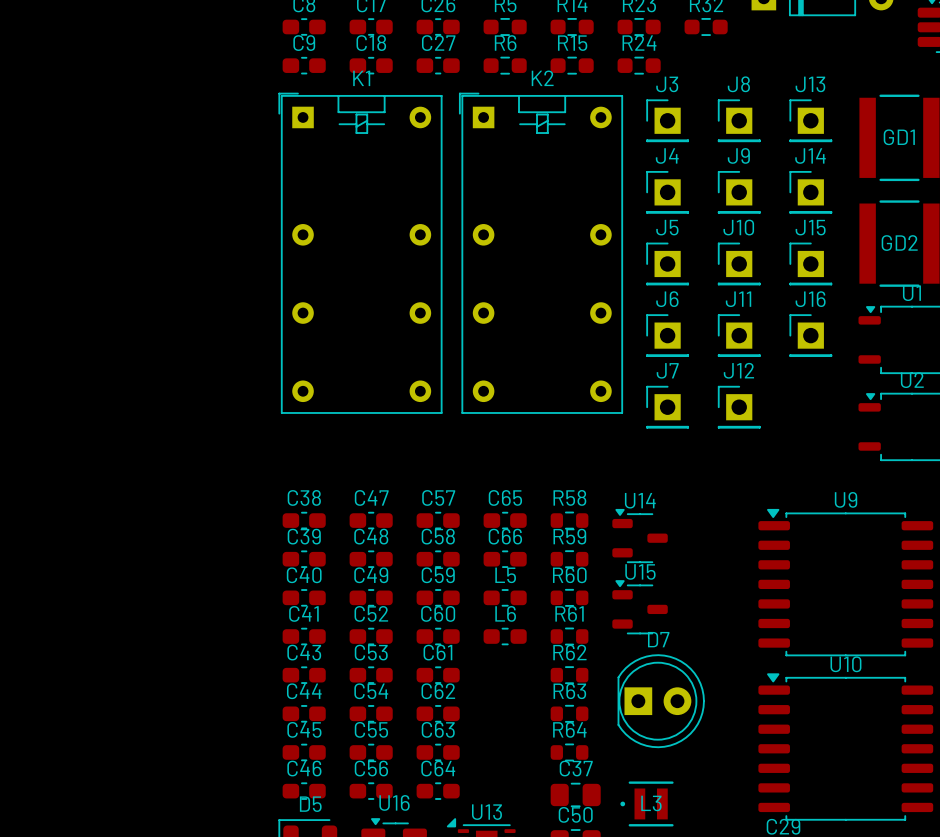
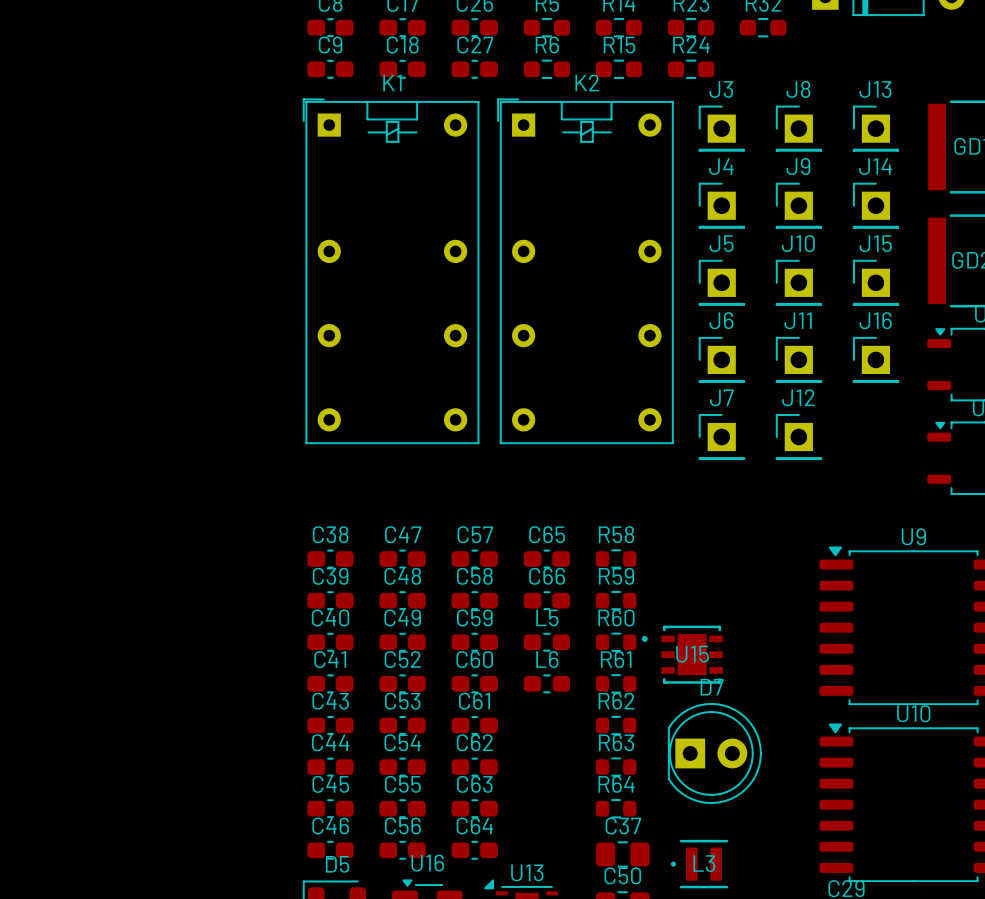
U14: (640, 536) -> none
U15 name position: U15 (640, 571) -> U15 (692, 654)
U15 footprint: [612, 580, 668, 635] -> [641, 625, 723, 684]

